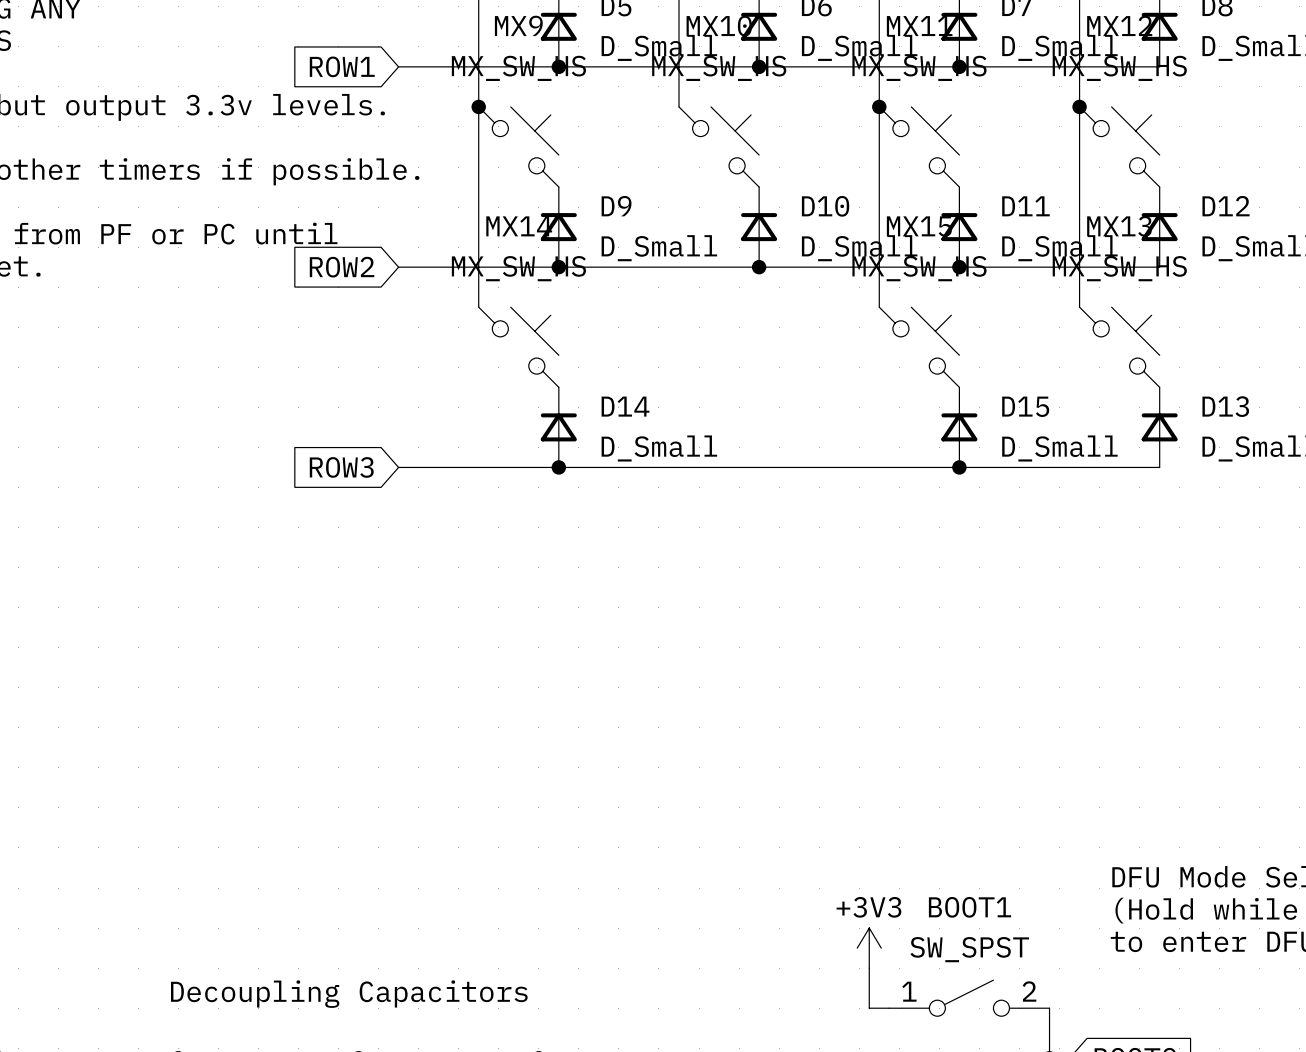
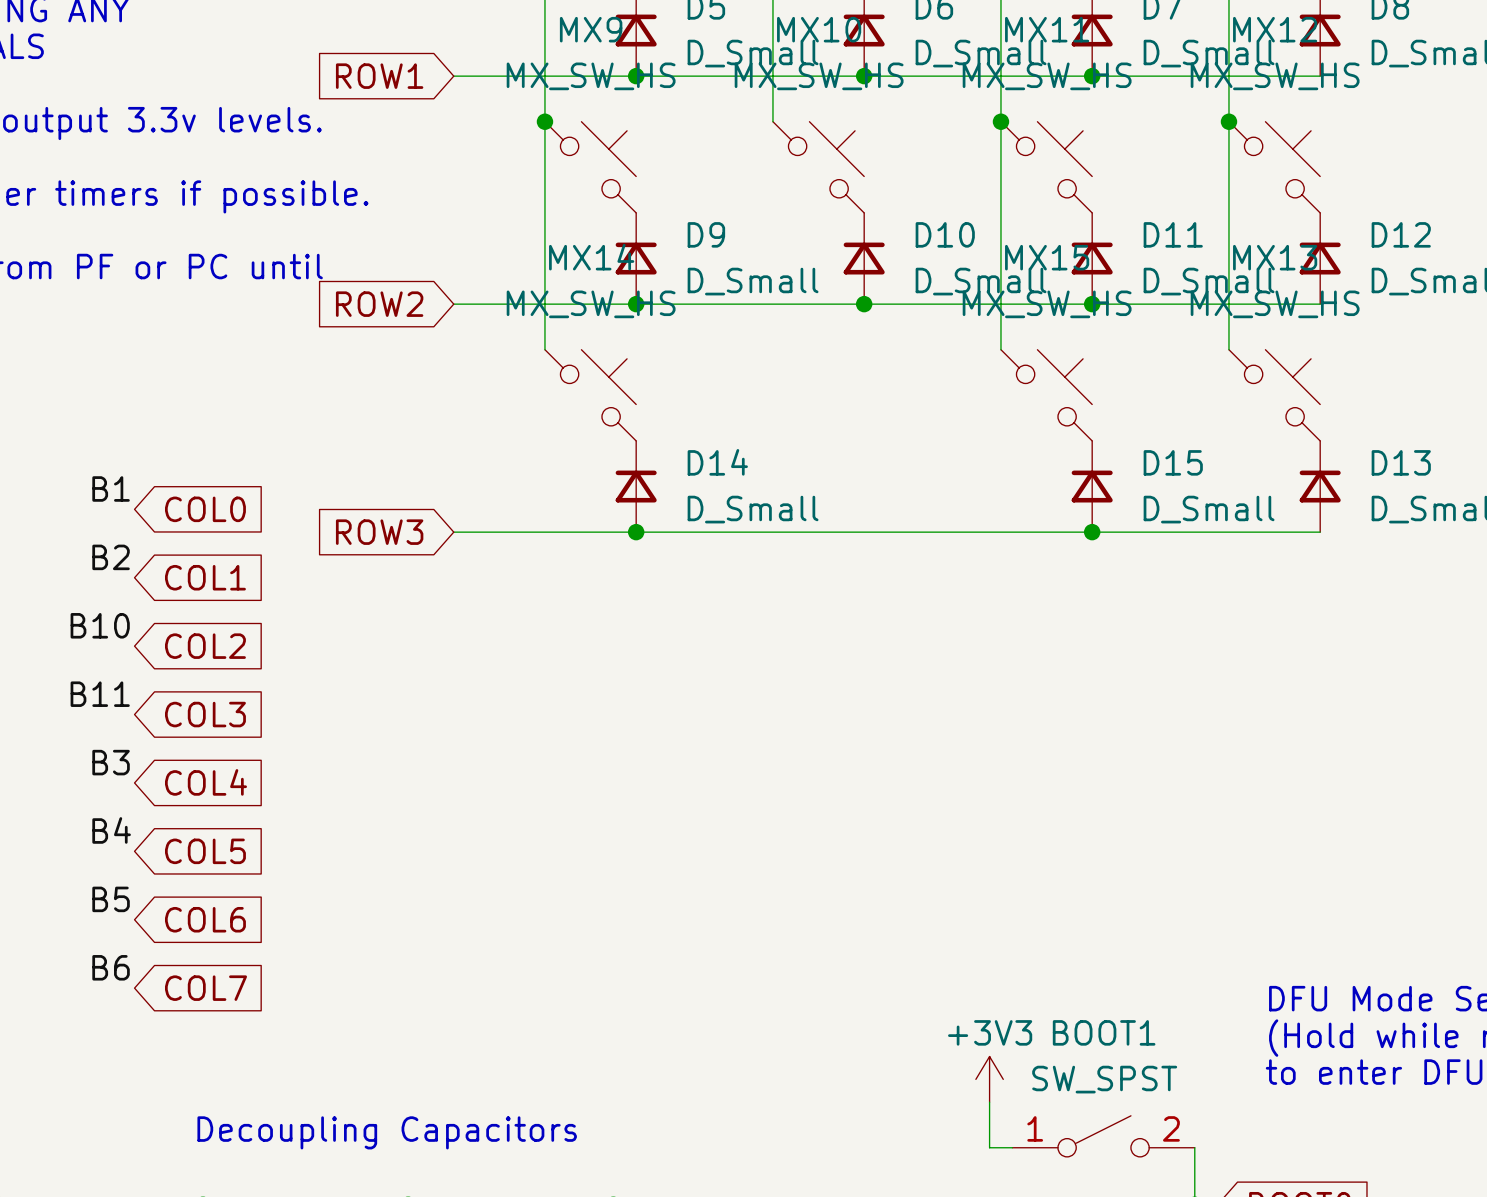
label: none -> B1 (111, 488)
global label: none -> COL0 (205, 509)
label: none -> B2 (111, 557)
global label: none -> COL1 (205, 577)
label: none -> B10 (100, 625)
global label: none -> COL2 (205, 646)
label: none -> B11 (100, 694)
global label: none -> COL3 (205, 714)
label: none -> B3 (111, 762)
global label: none -> COL4 (205, 782)
label: none -> B4 (111, 830)
global label: none -> COL5 (205, 851)
label: none -> B5 (111, 899)
global label: none -> COL6 (205, 919)
label: none -> B6 (111, 967)
global label: none -> COL7 (205, 988)

